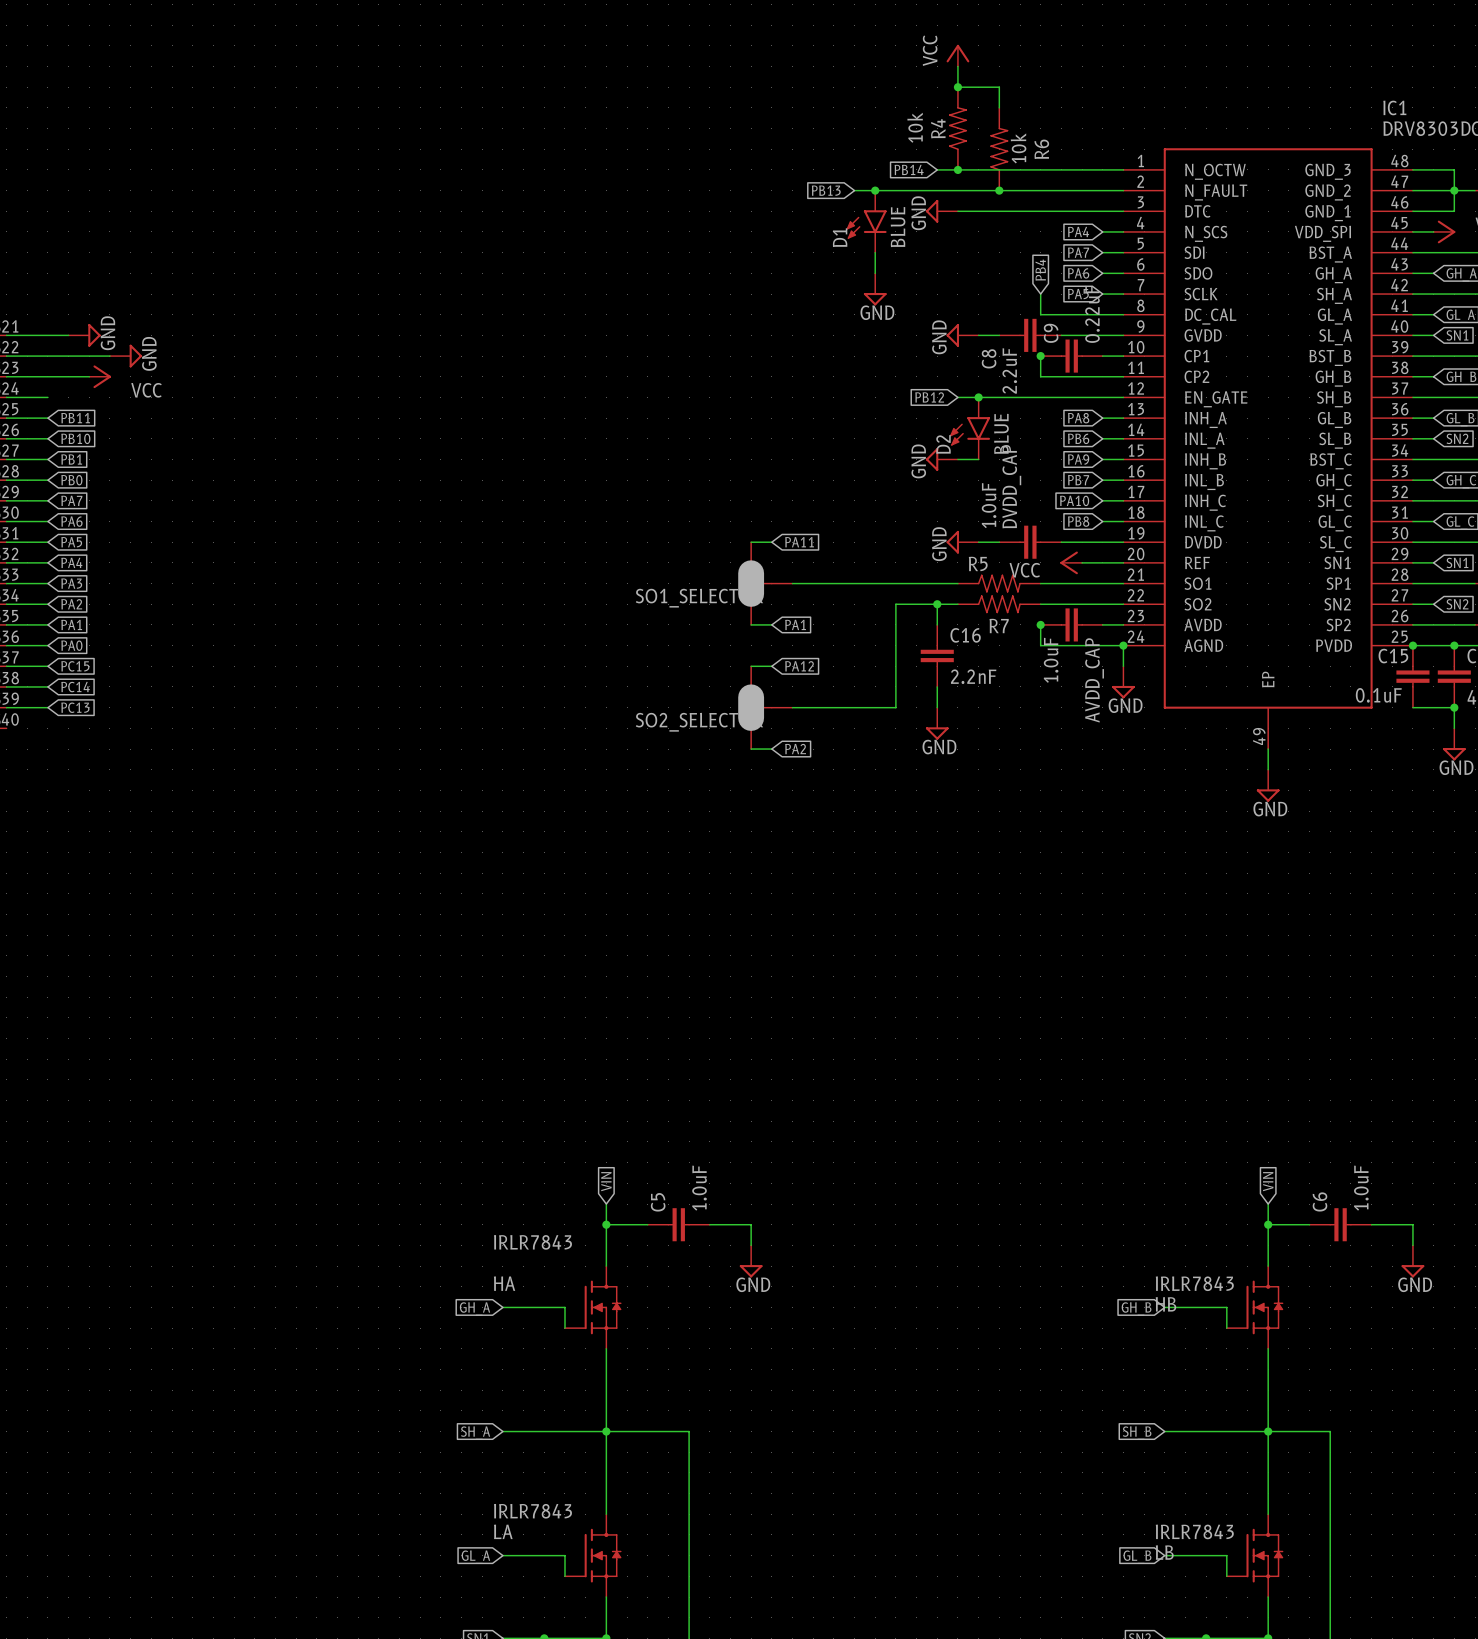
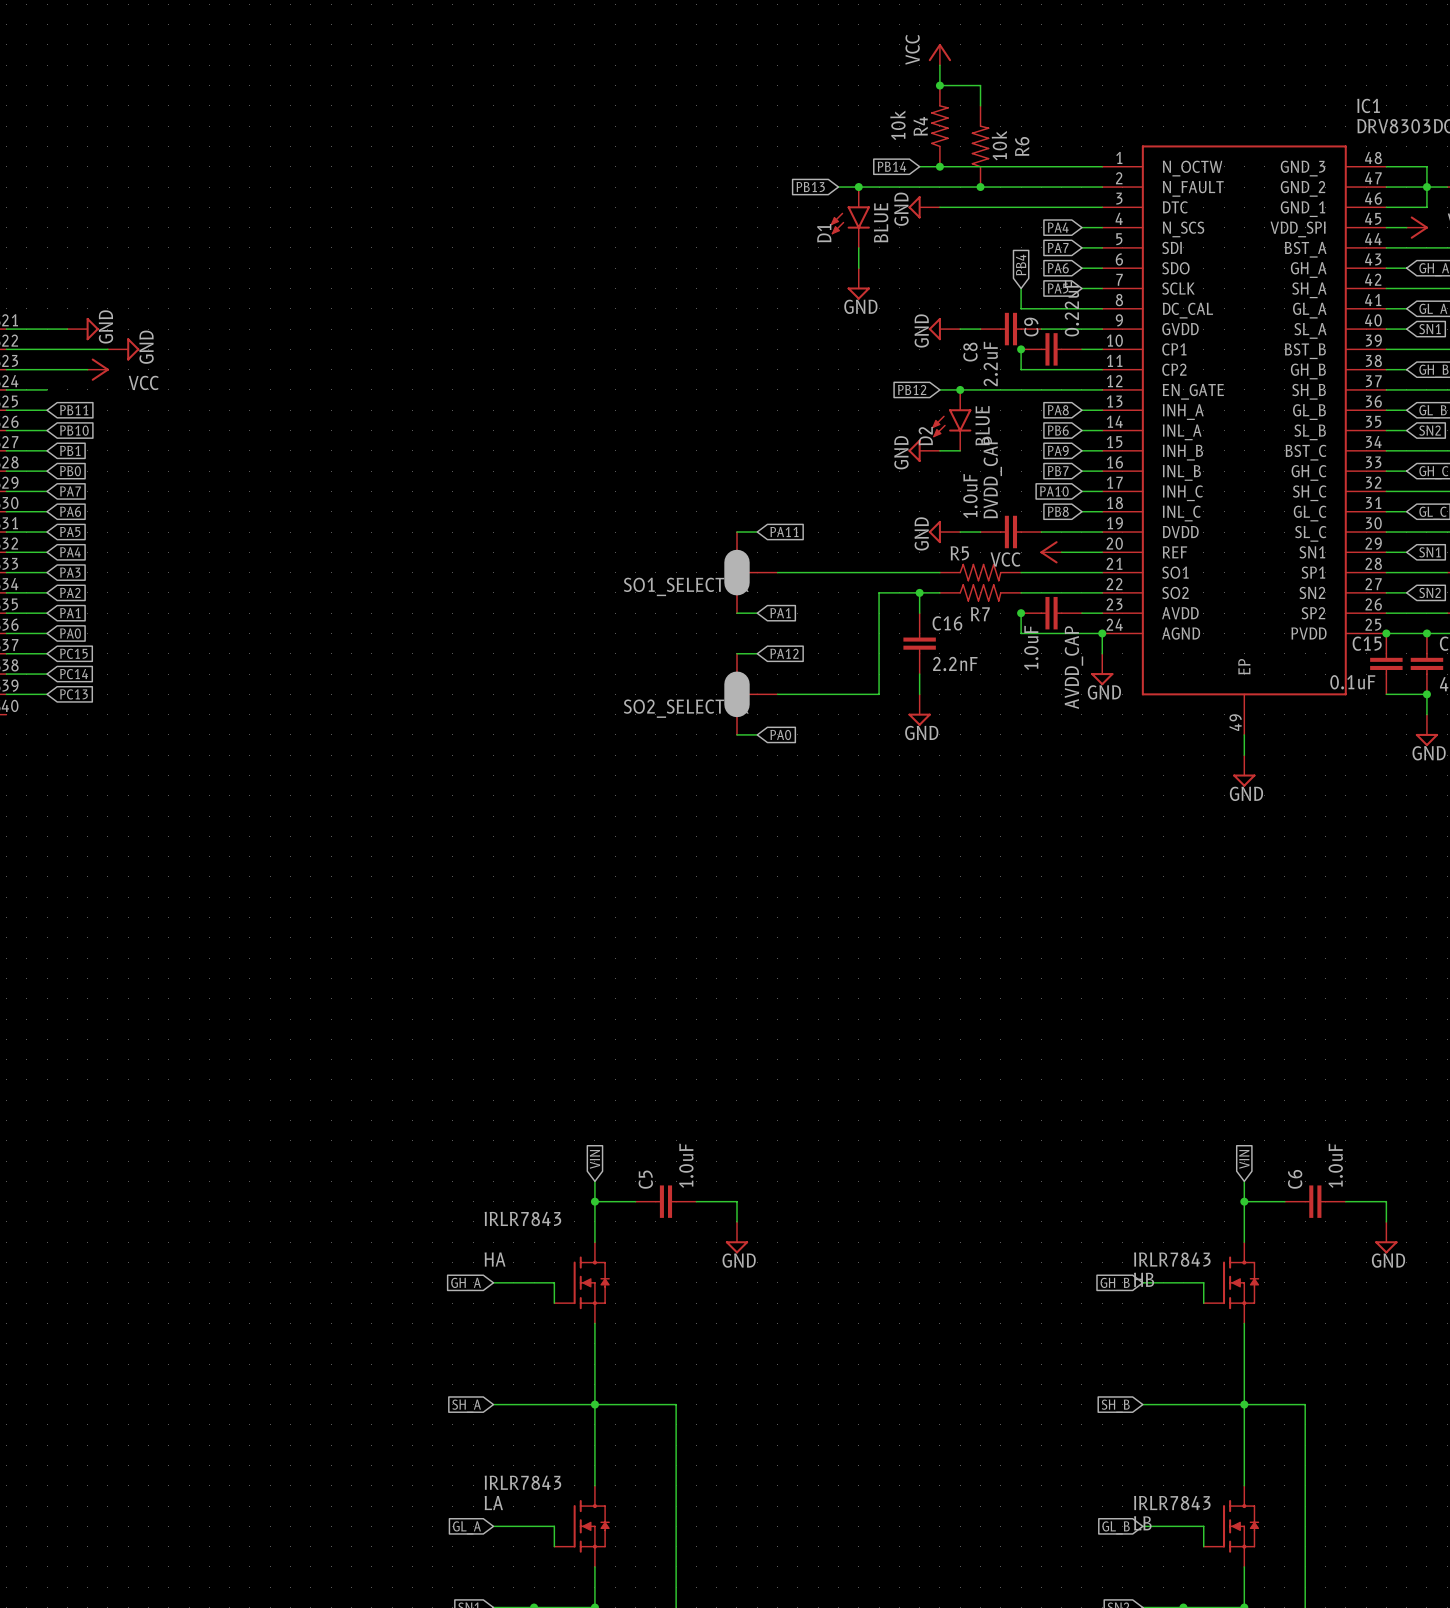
global label: PA2 (795, 749) -> PA0 (780, 734)

